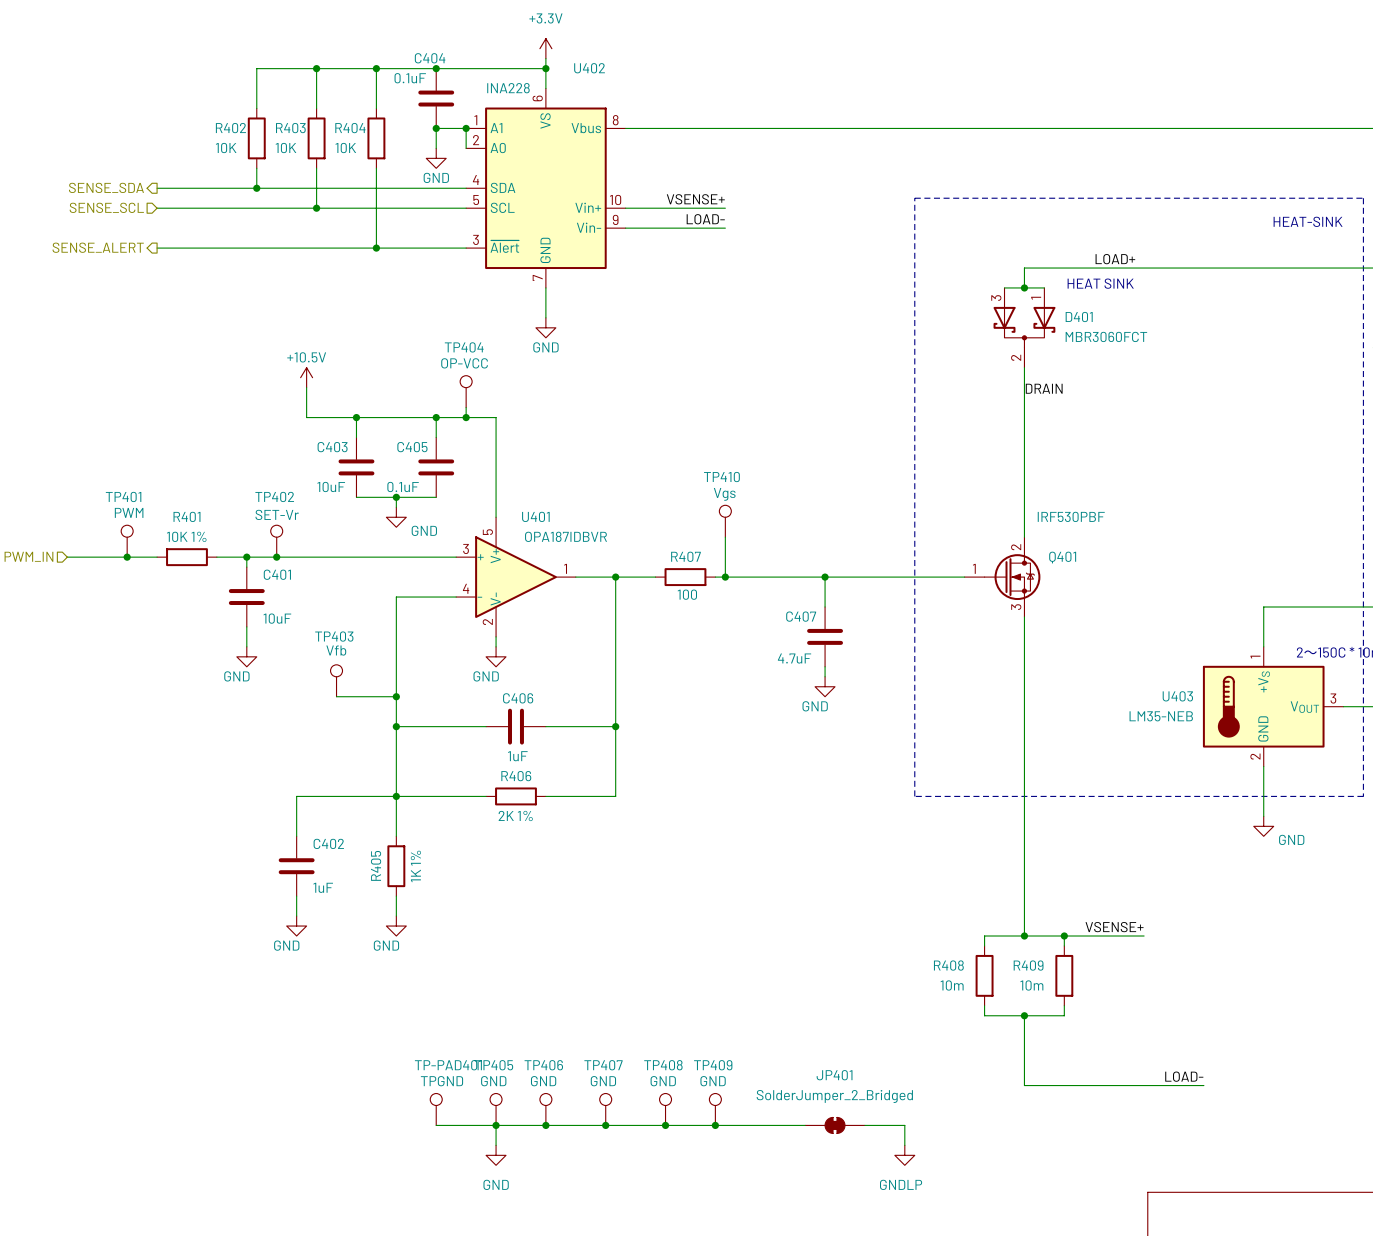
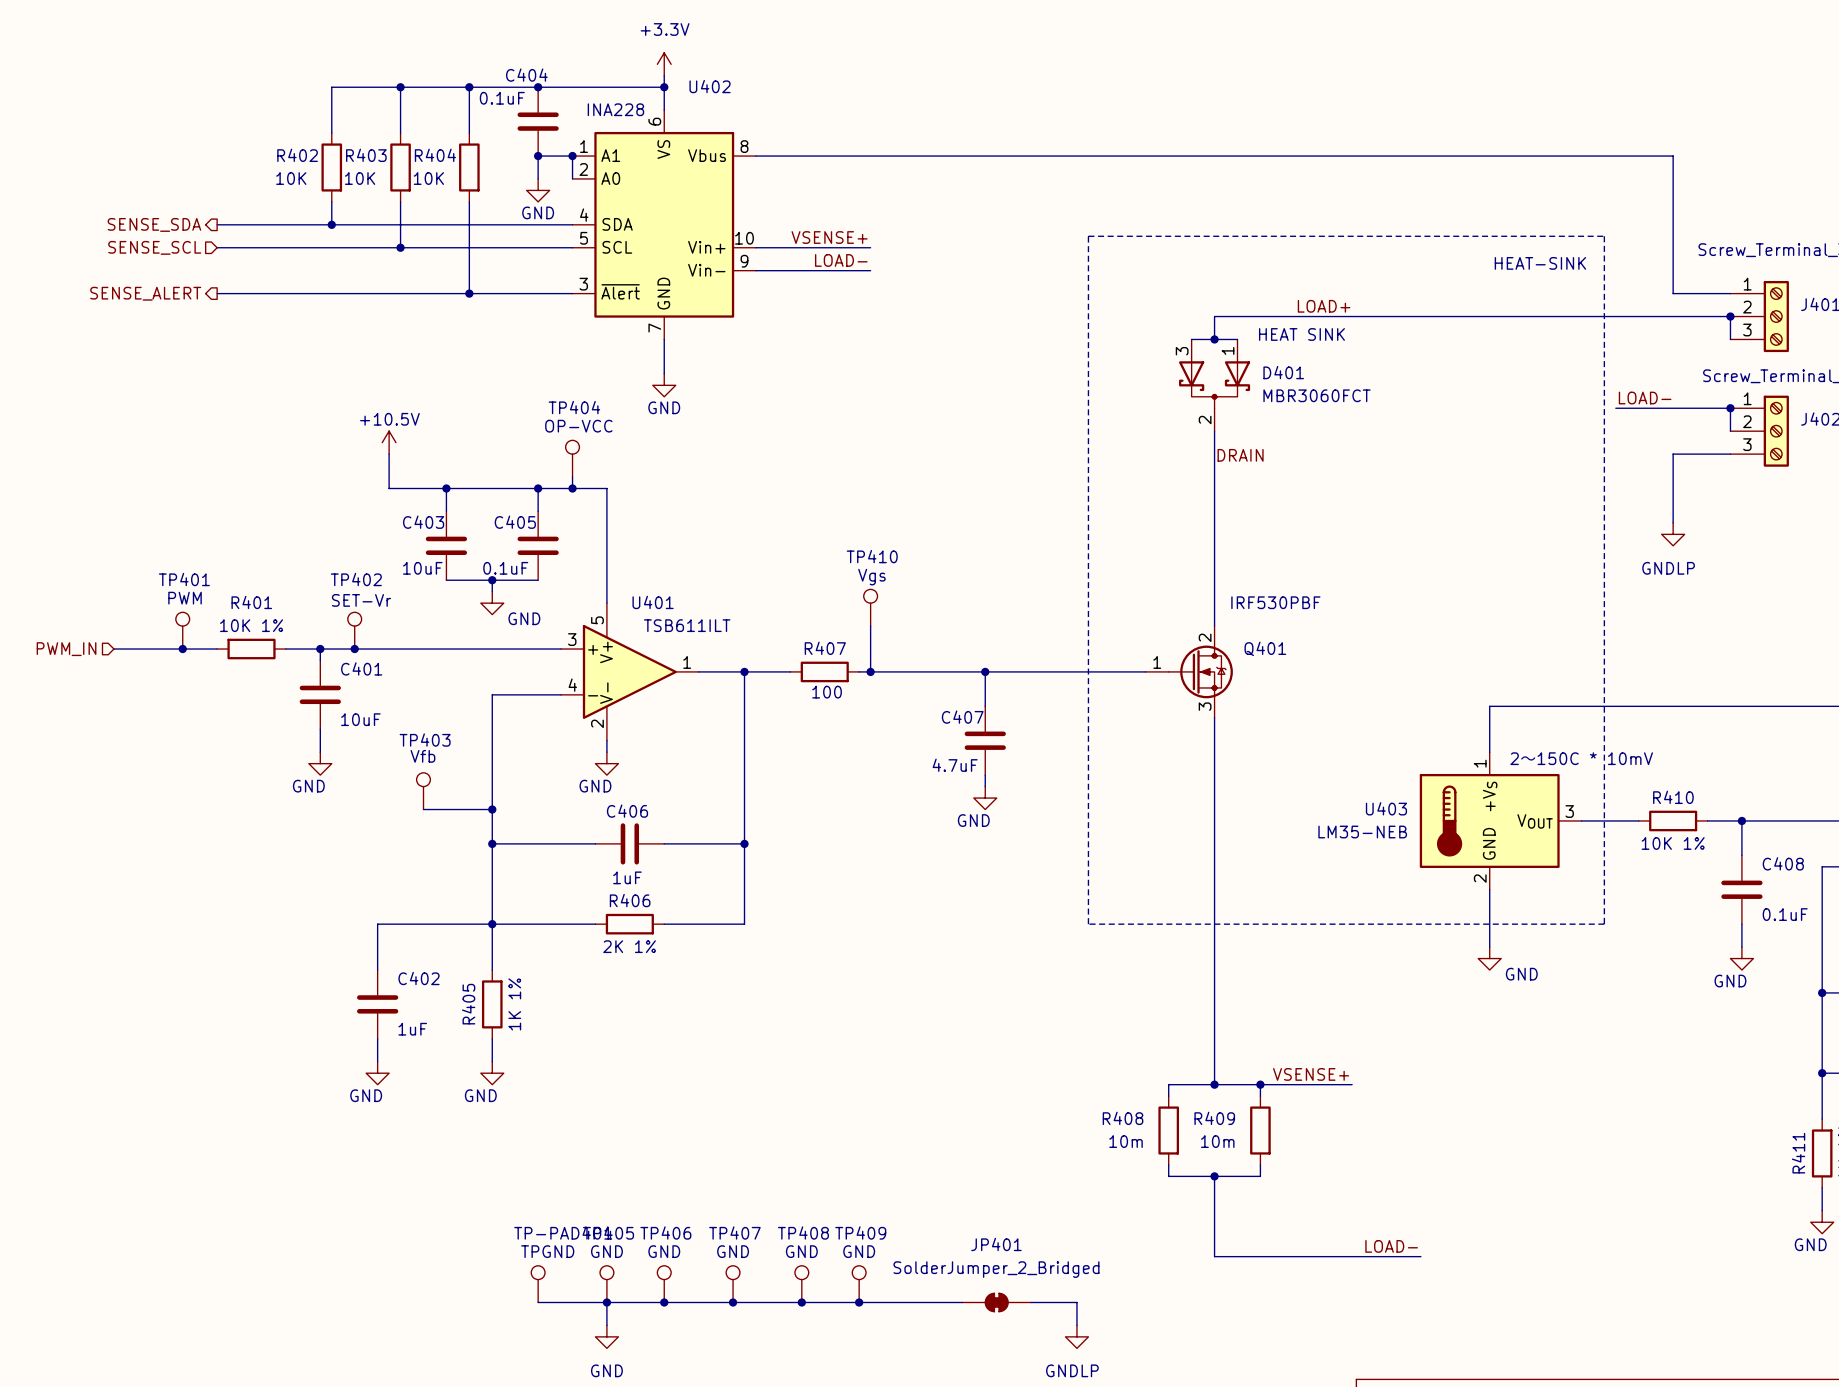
U401 value: OPA187IDBVR (566, 536) -> TSB611ILT (687, 625)

